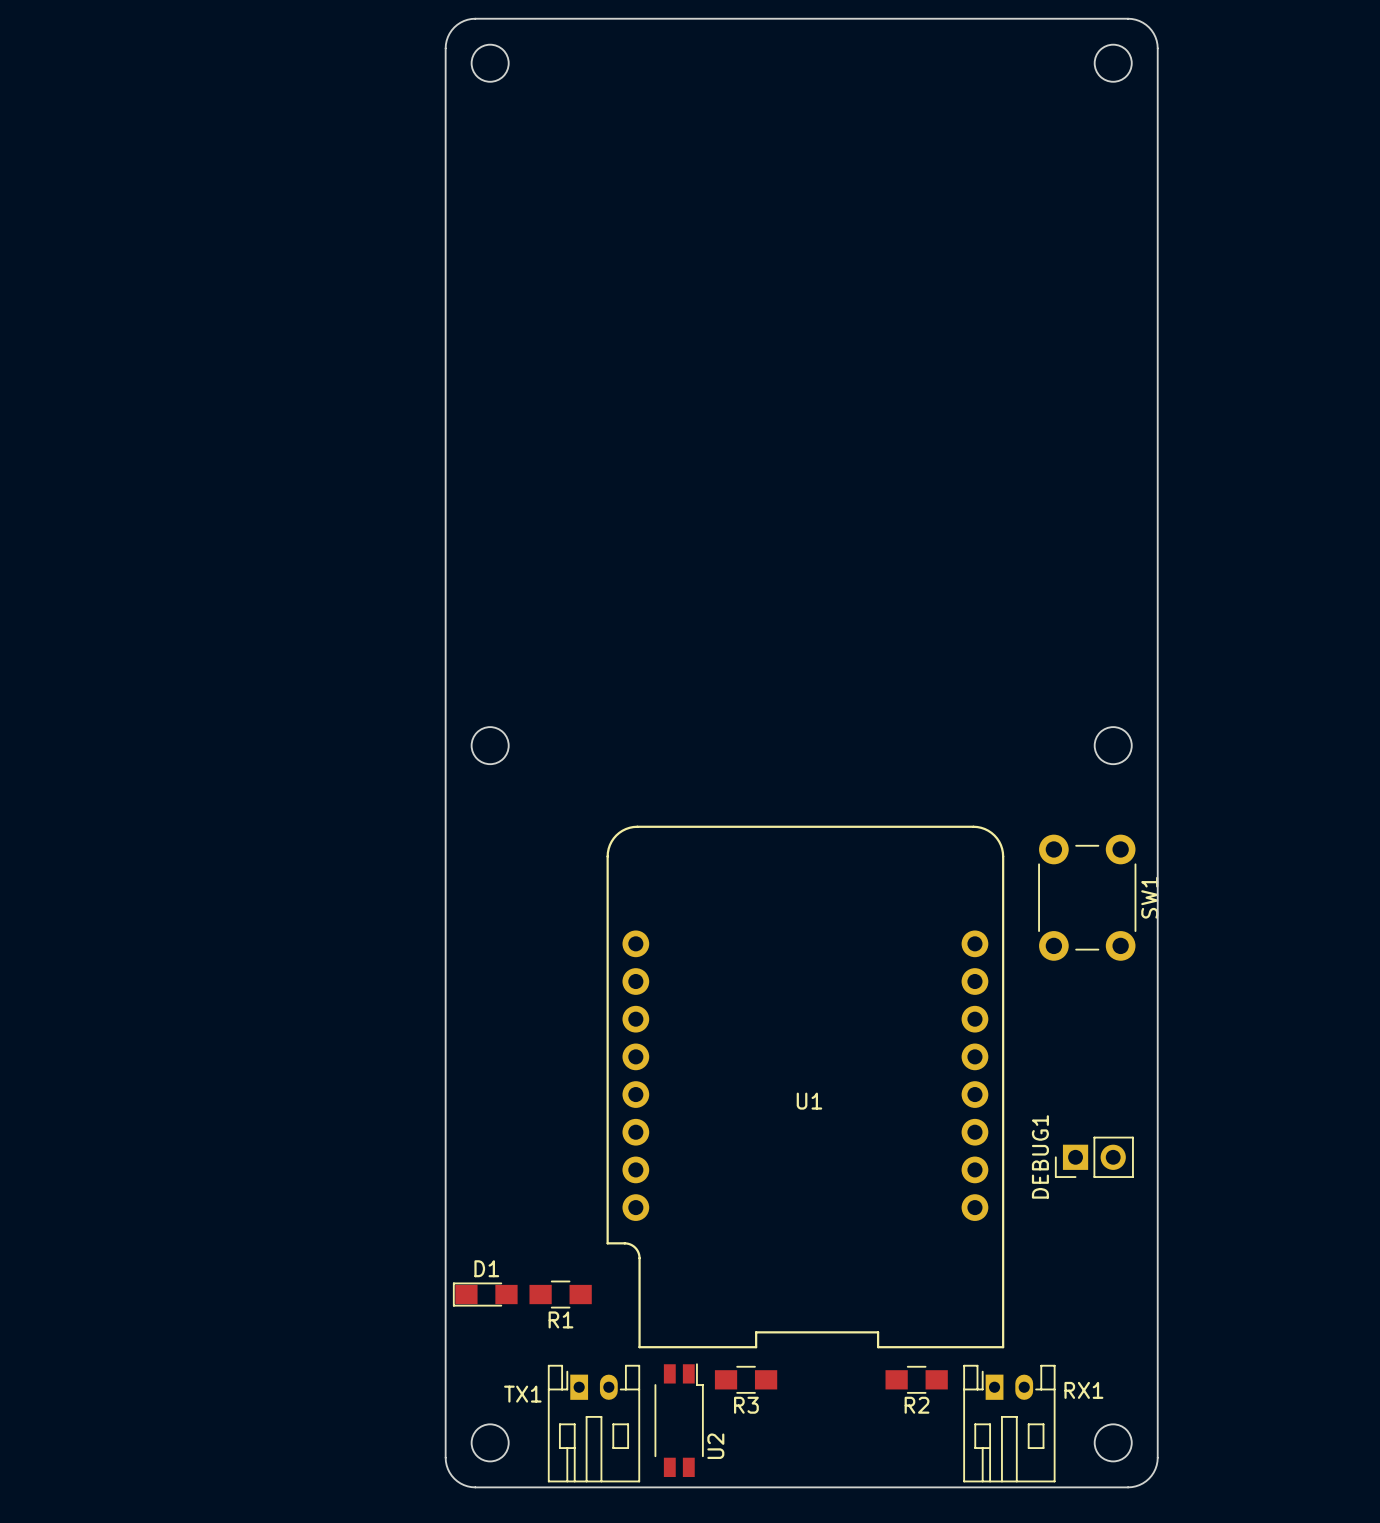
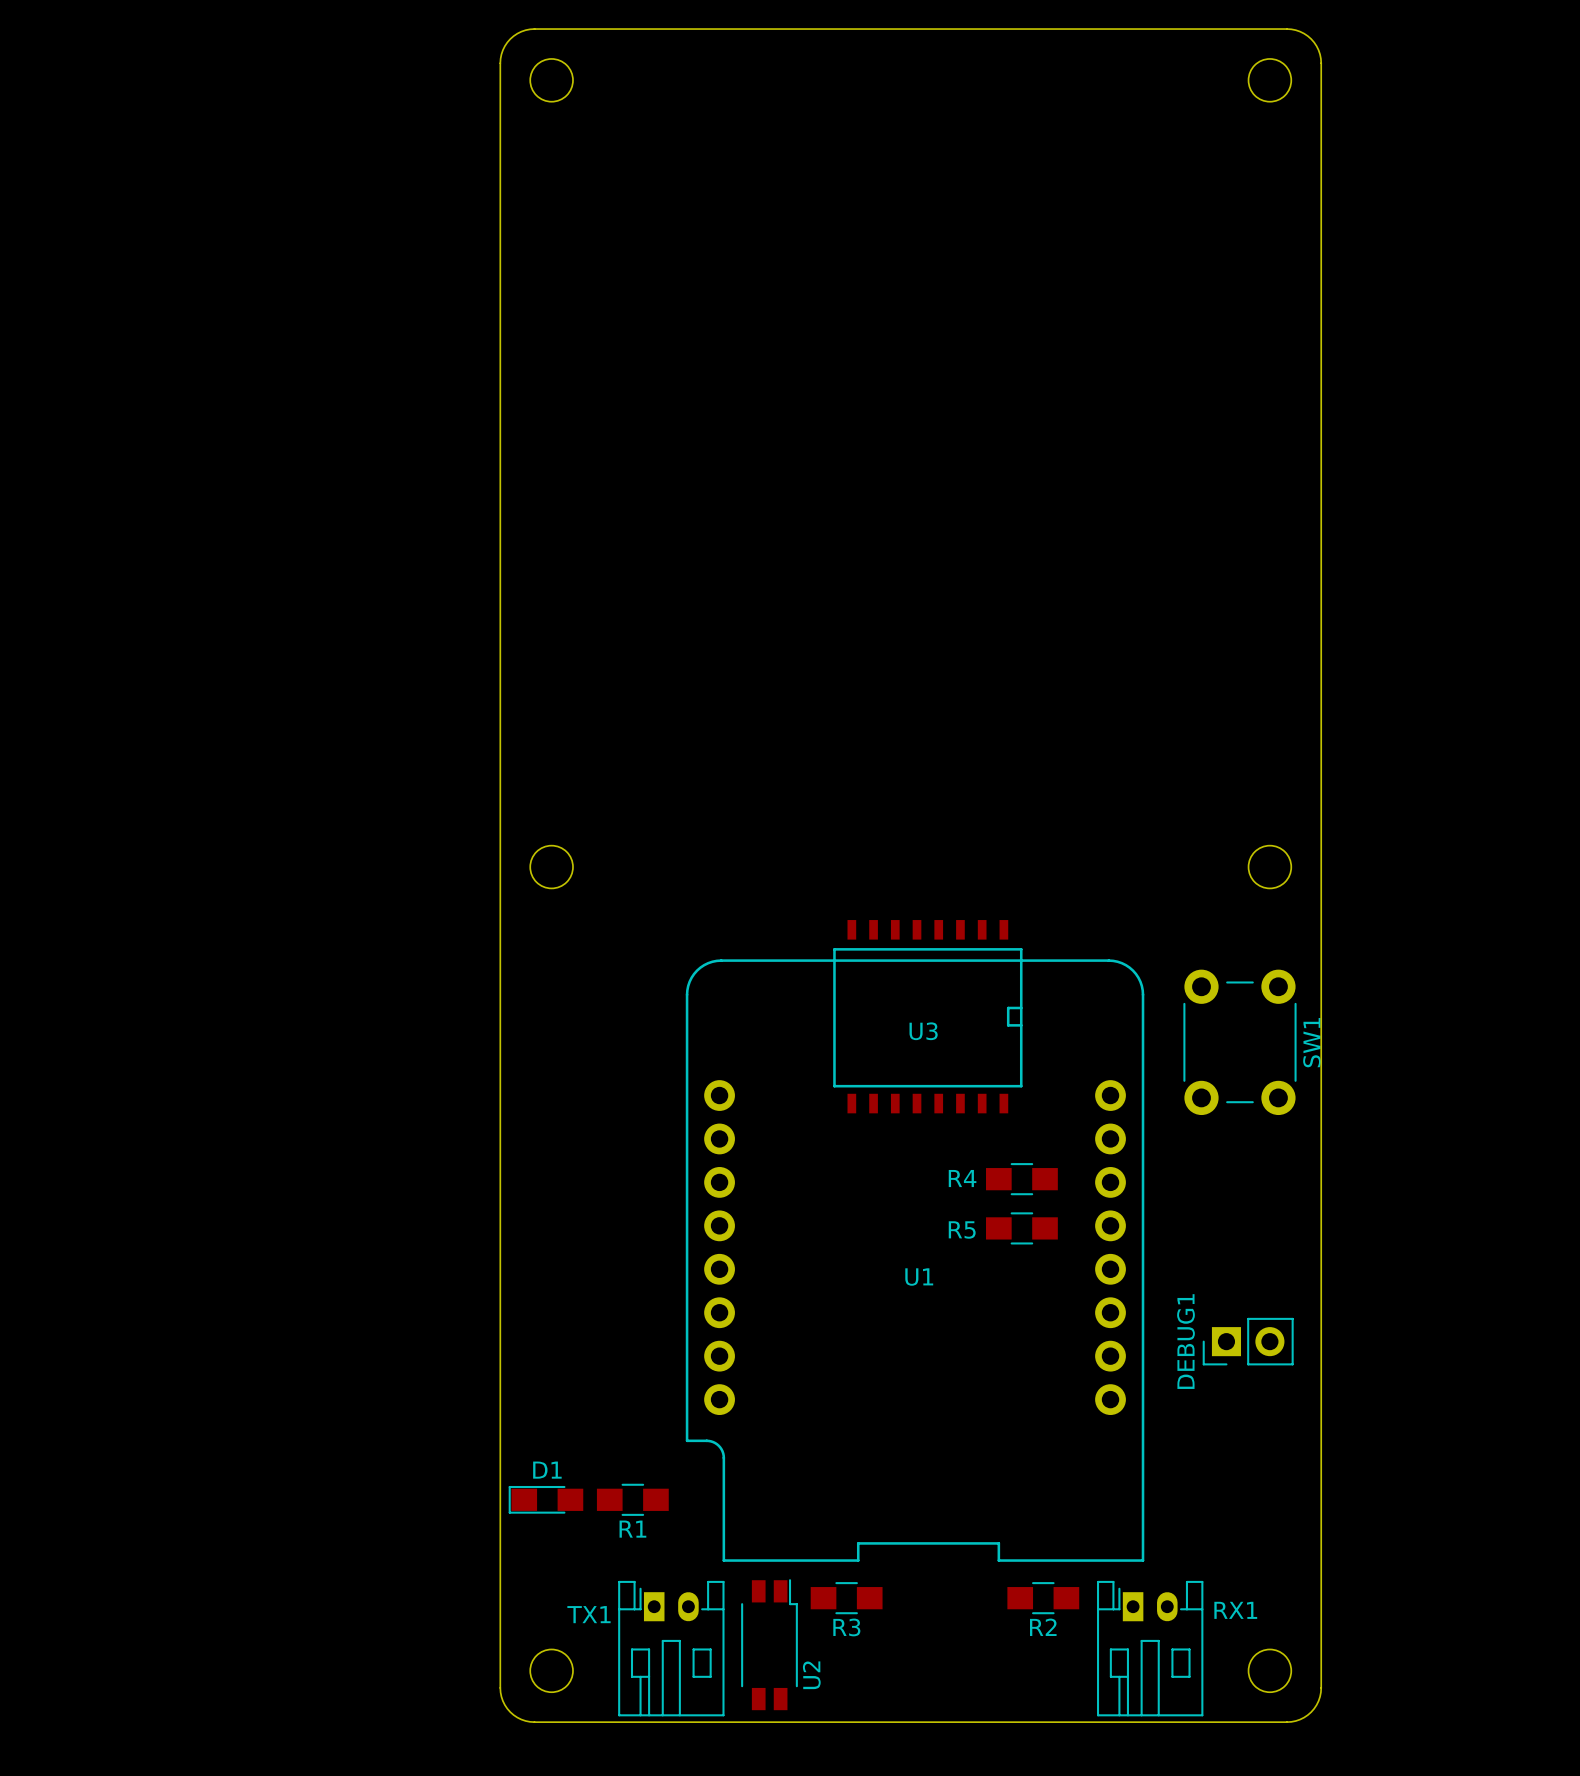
U3: none -> (927, 1016)
R4: none -> (1021, 1179)
R5: none -> (1021, 1228)

